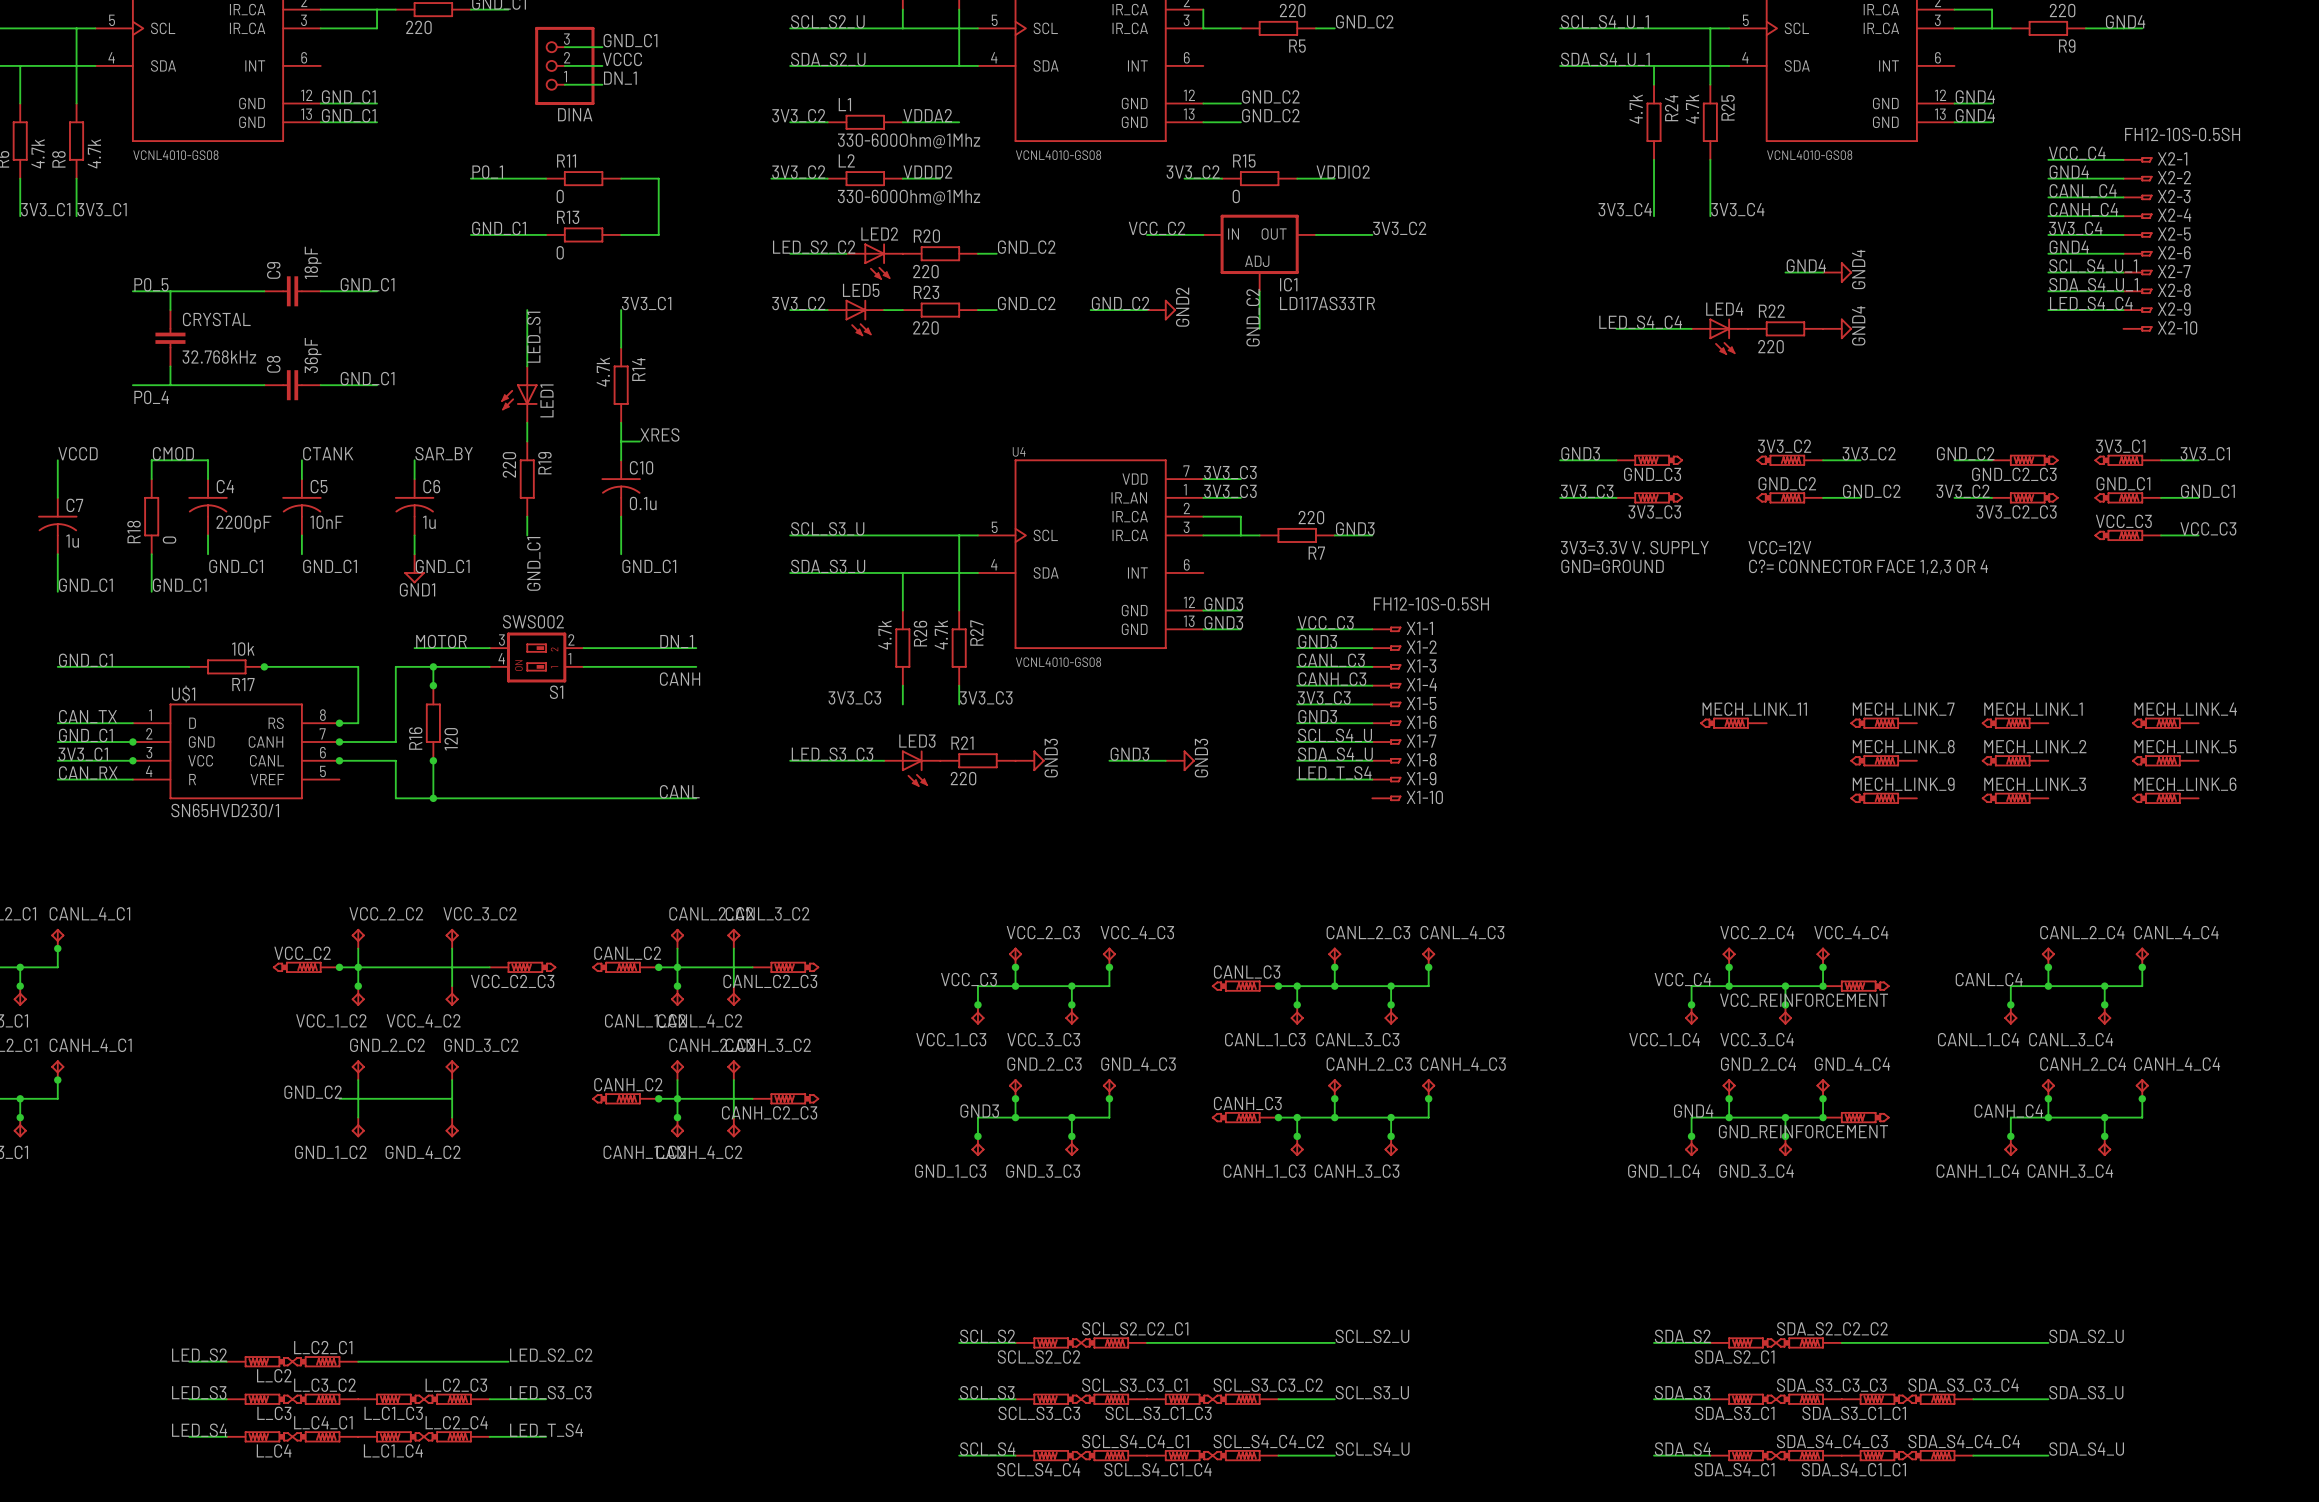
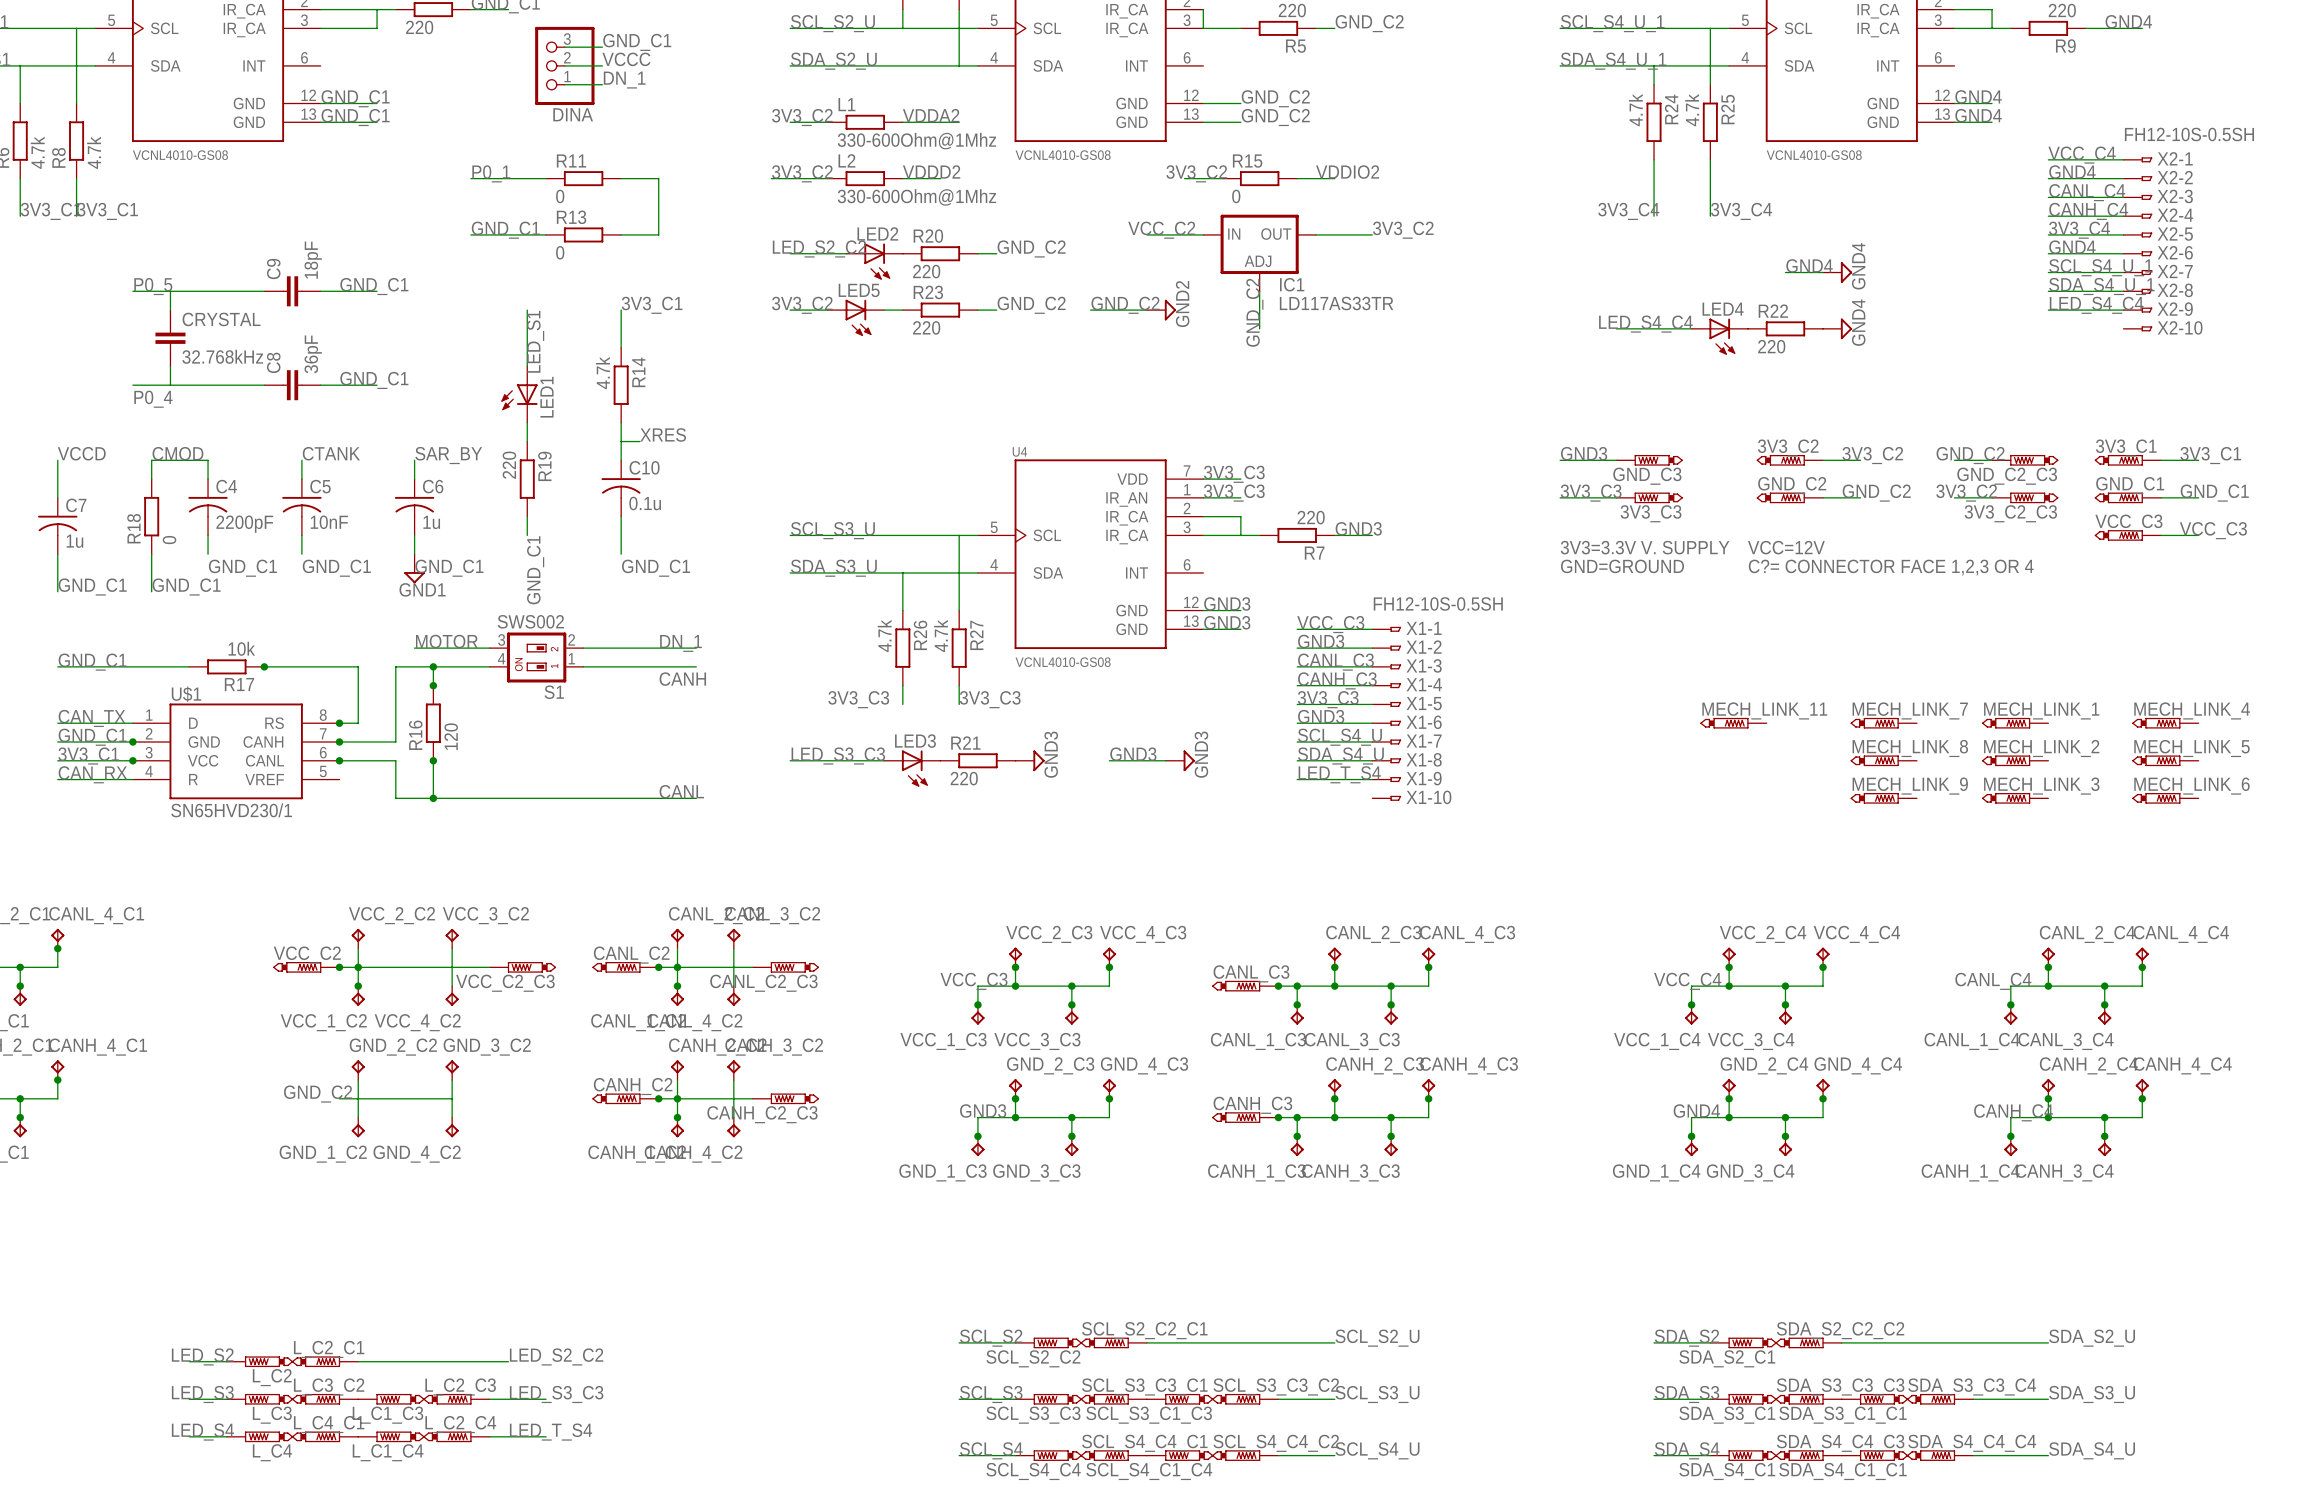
junction: (1823, 986) -> none
VCC_REINFORCEMENT: (1856, 986) -> none
junction: (1823, 1117) -> none
GND_REINFORCEMENT: (1856, 1117) -> none

